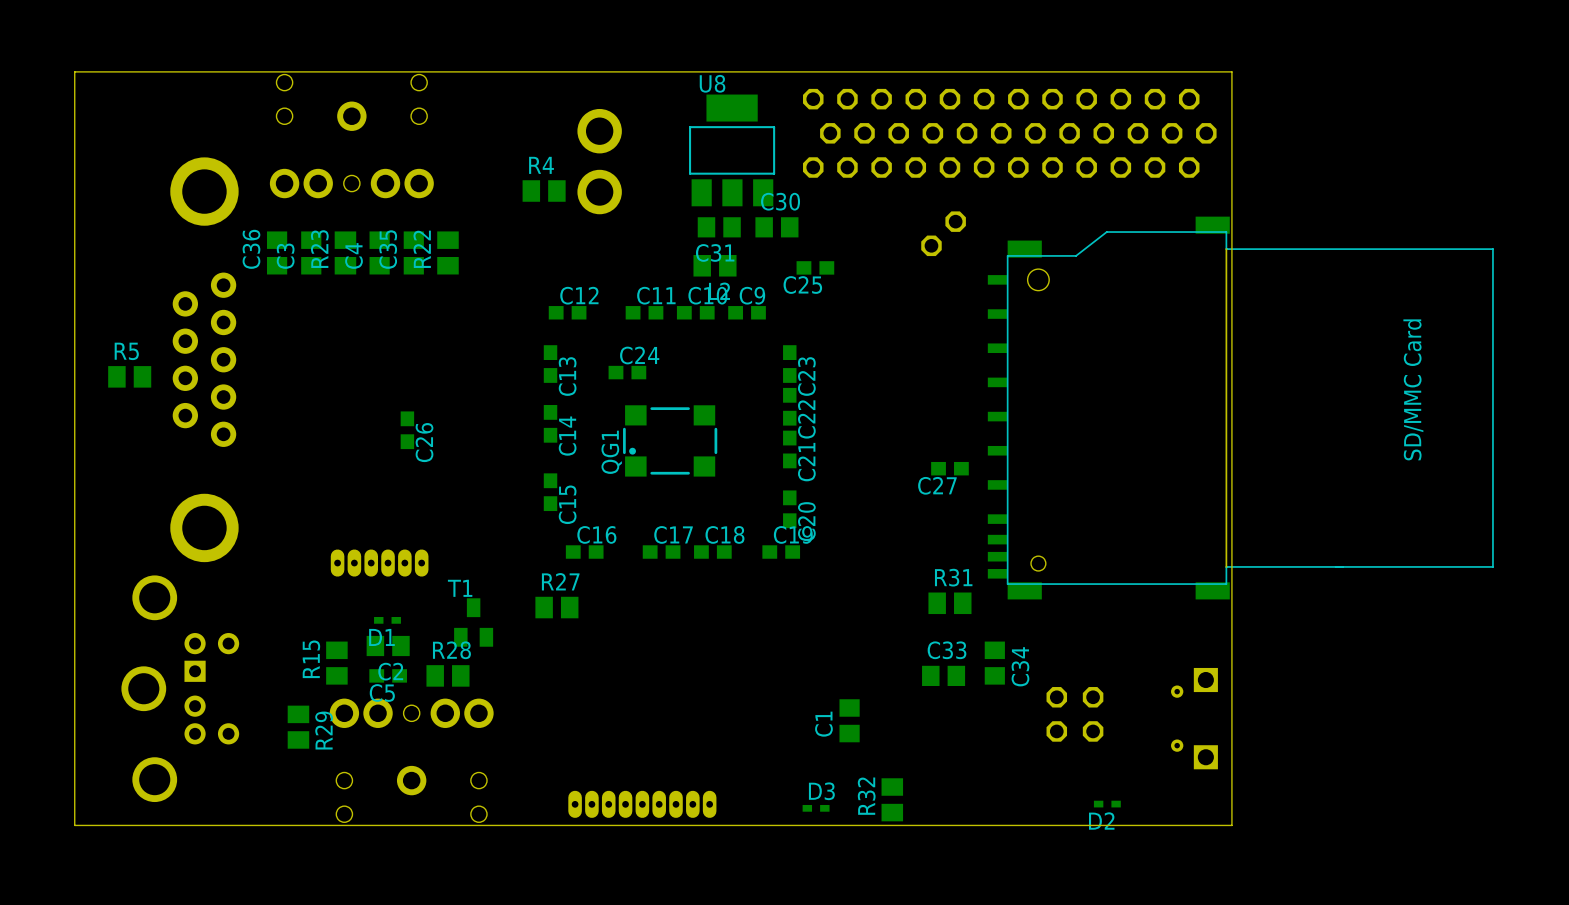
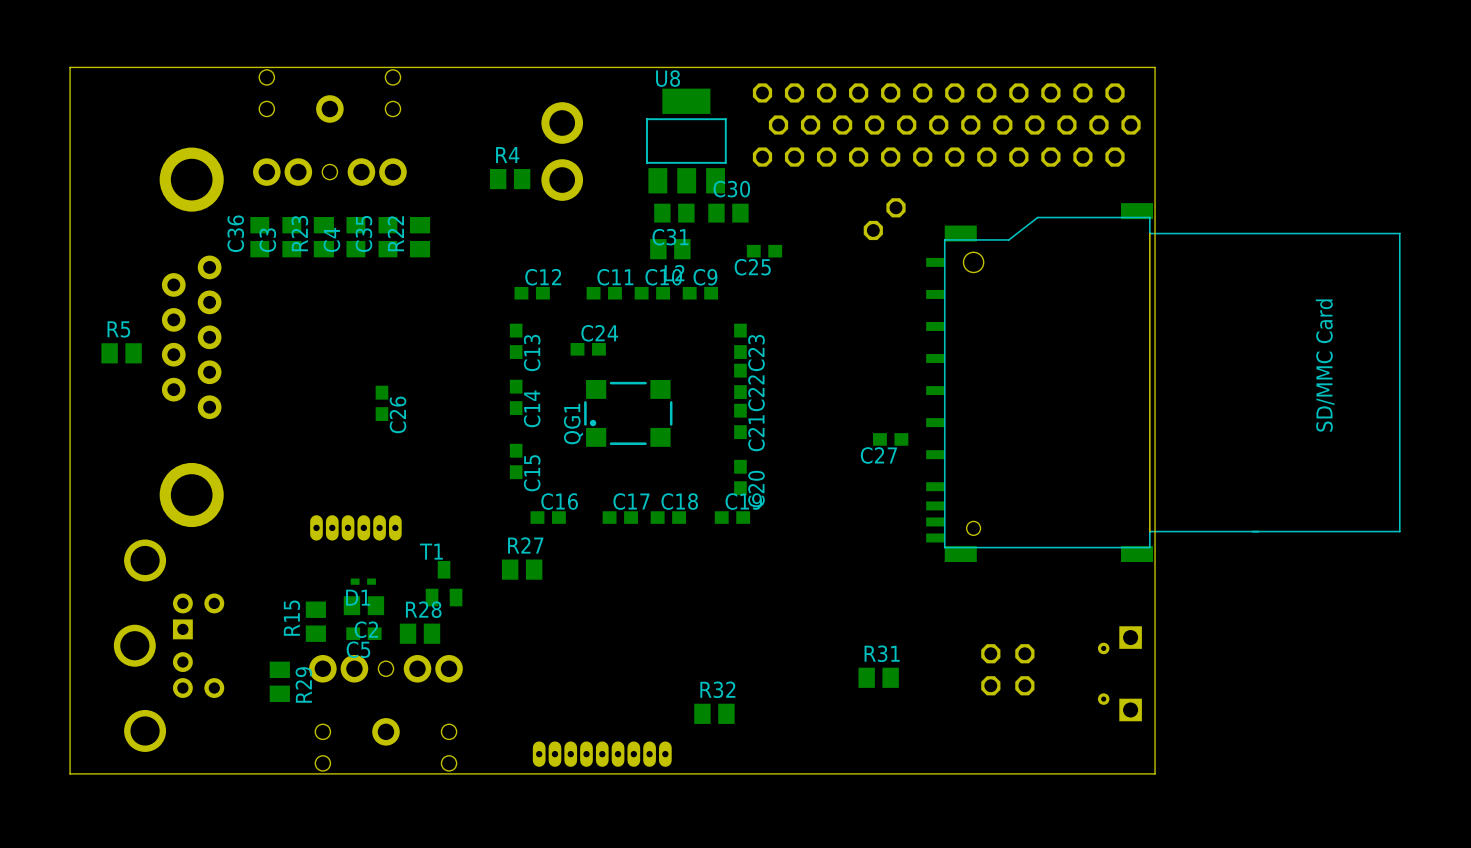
R31 position: (949, 603) -> (878, 677)
C34: (994, 663) -> none
C33: (943, 675) -> none
C1: (849, 720) -> none
R32 rotation: 0° (892, 799) -> 90° clockwise (714, 713)
R32 position: (892, 799) -> (714, 713)
D2: (1107, 804) -> none
D3: (816, 808) -> none

